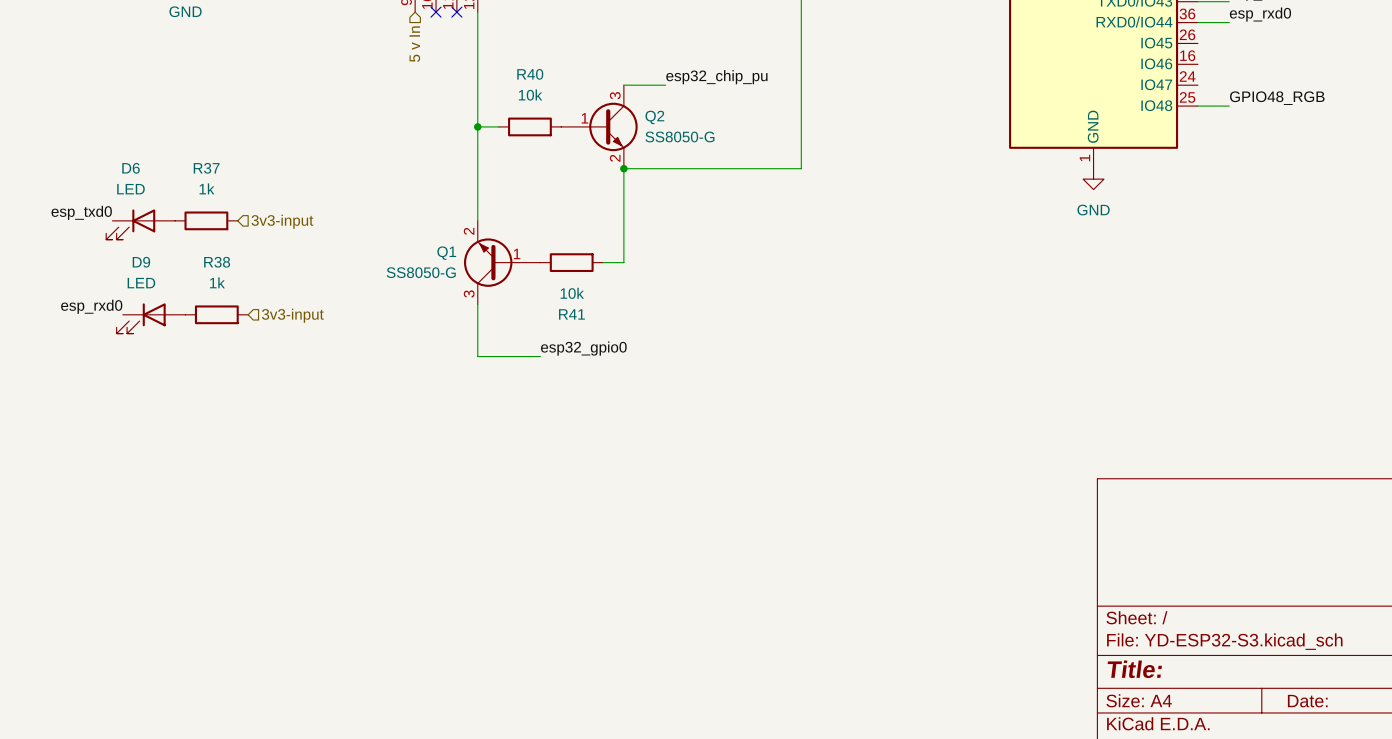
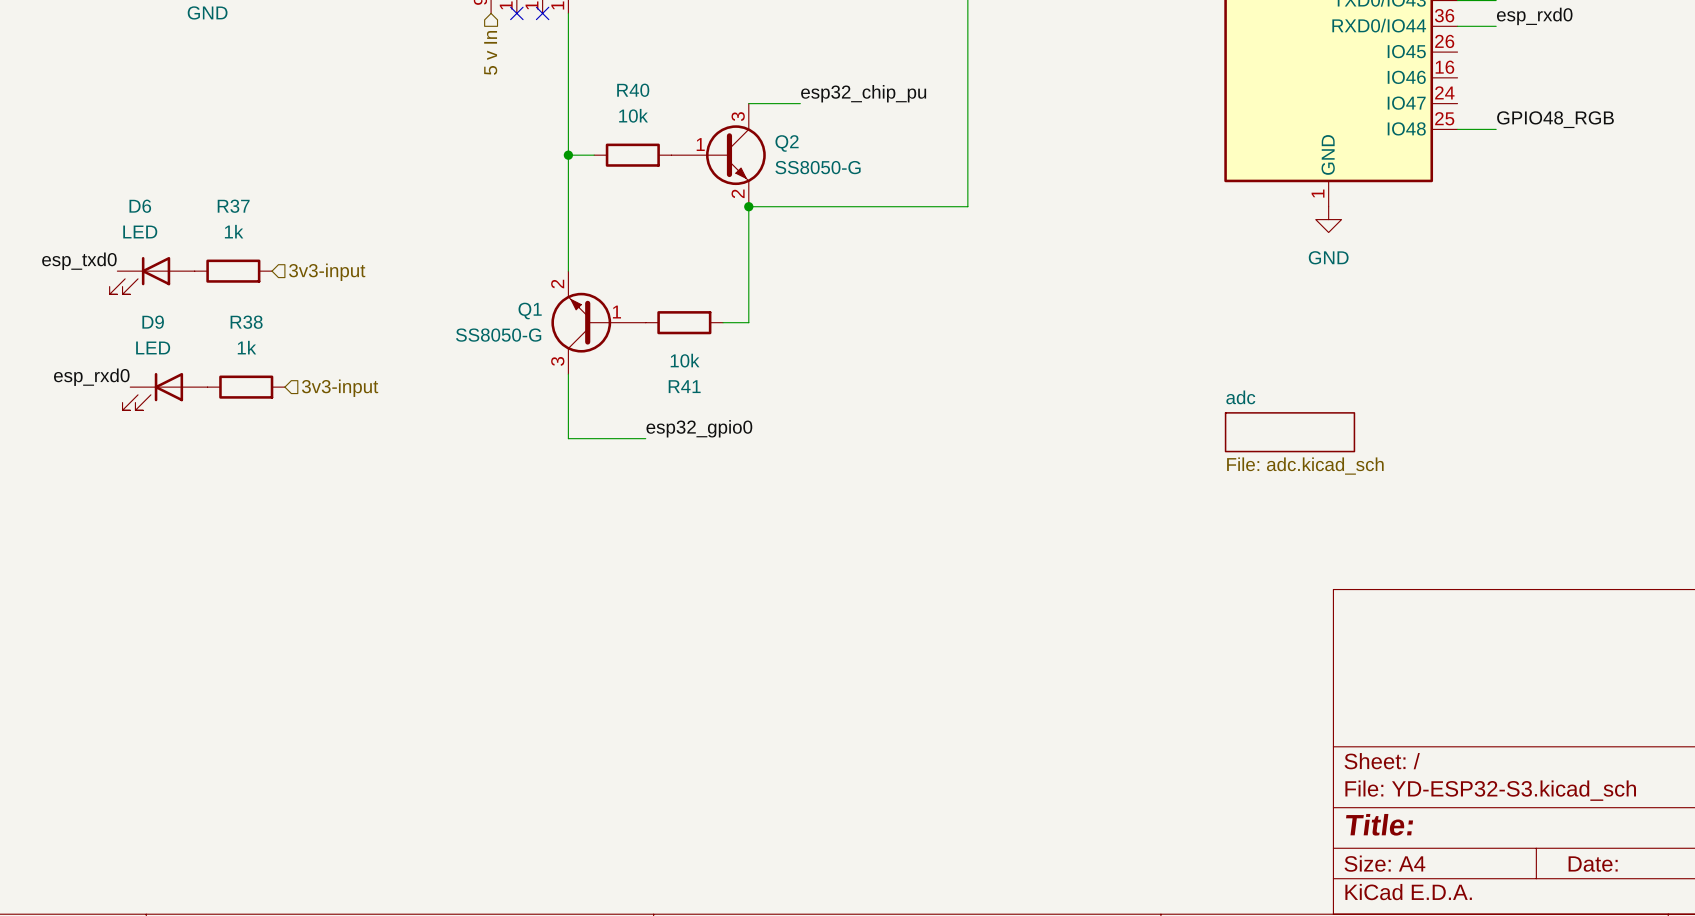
sheet adc: none -> File: adc.kicad_sch (1290, 432)

